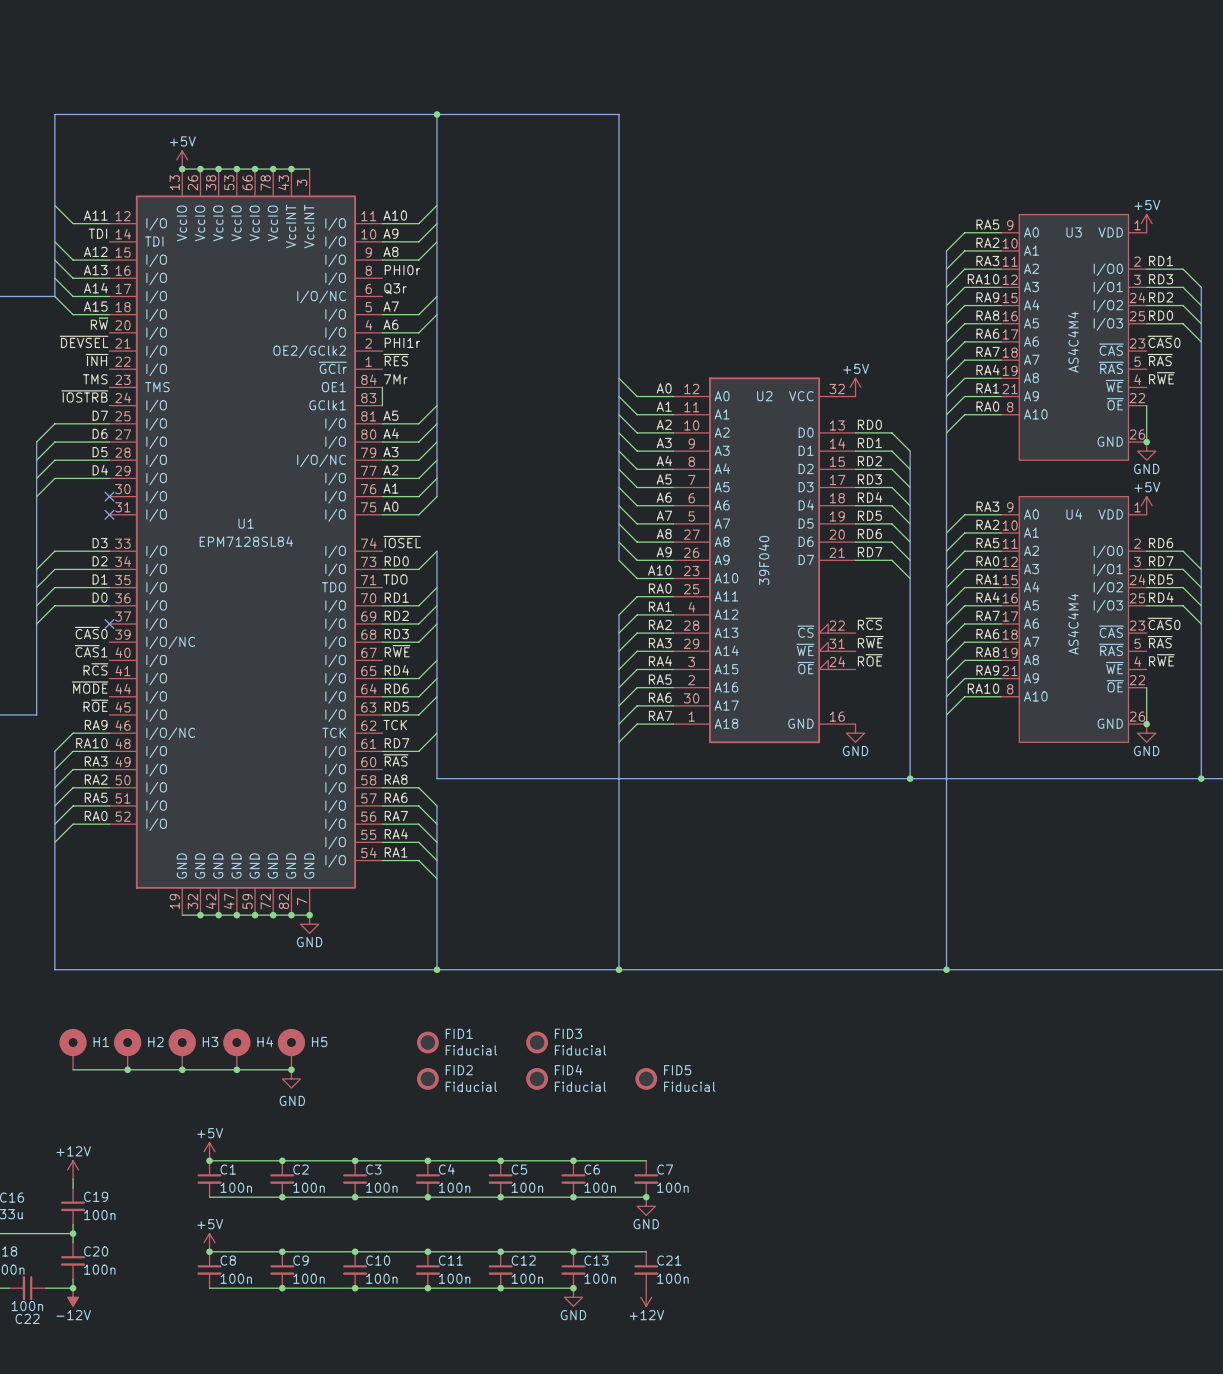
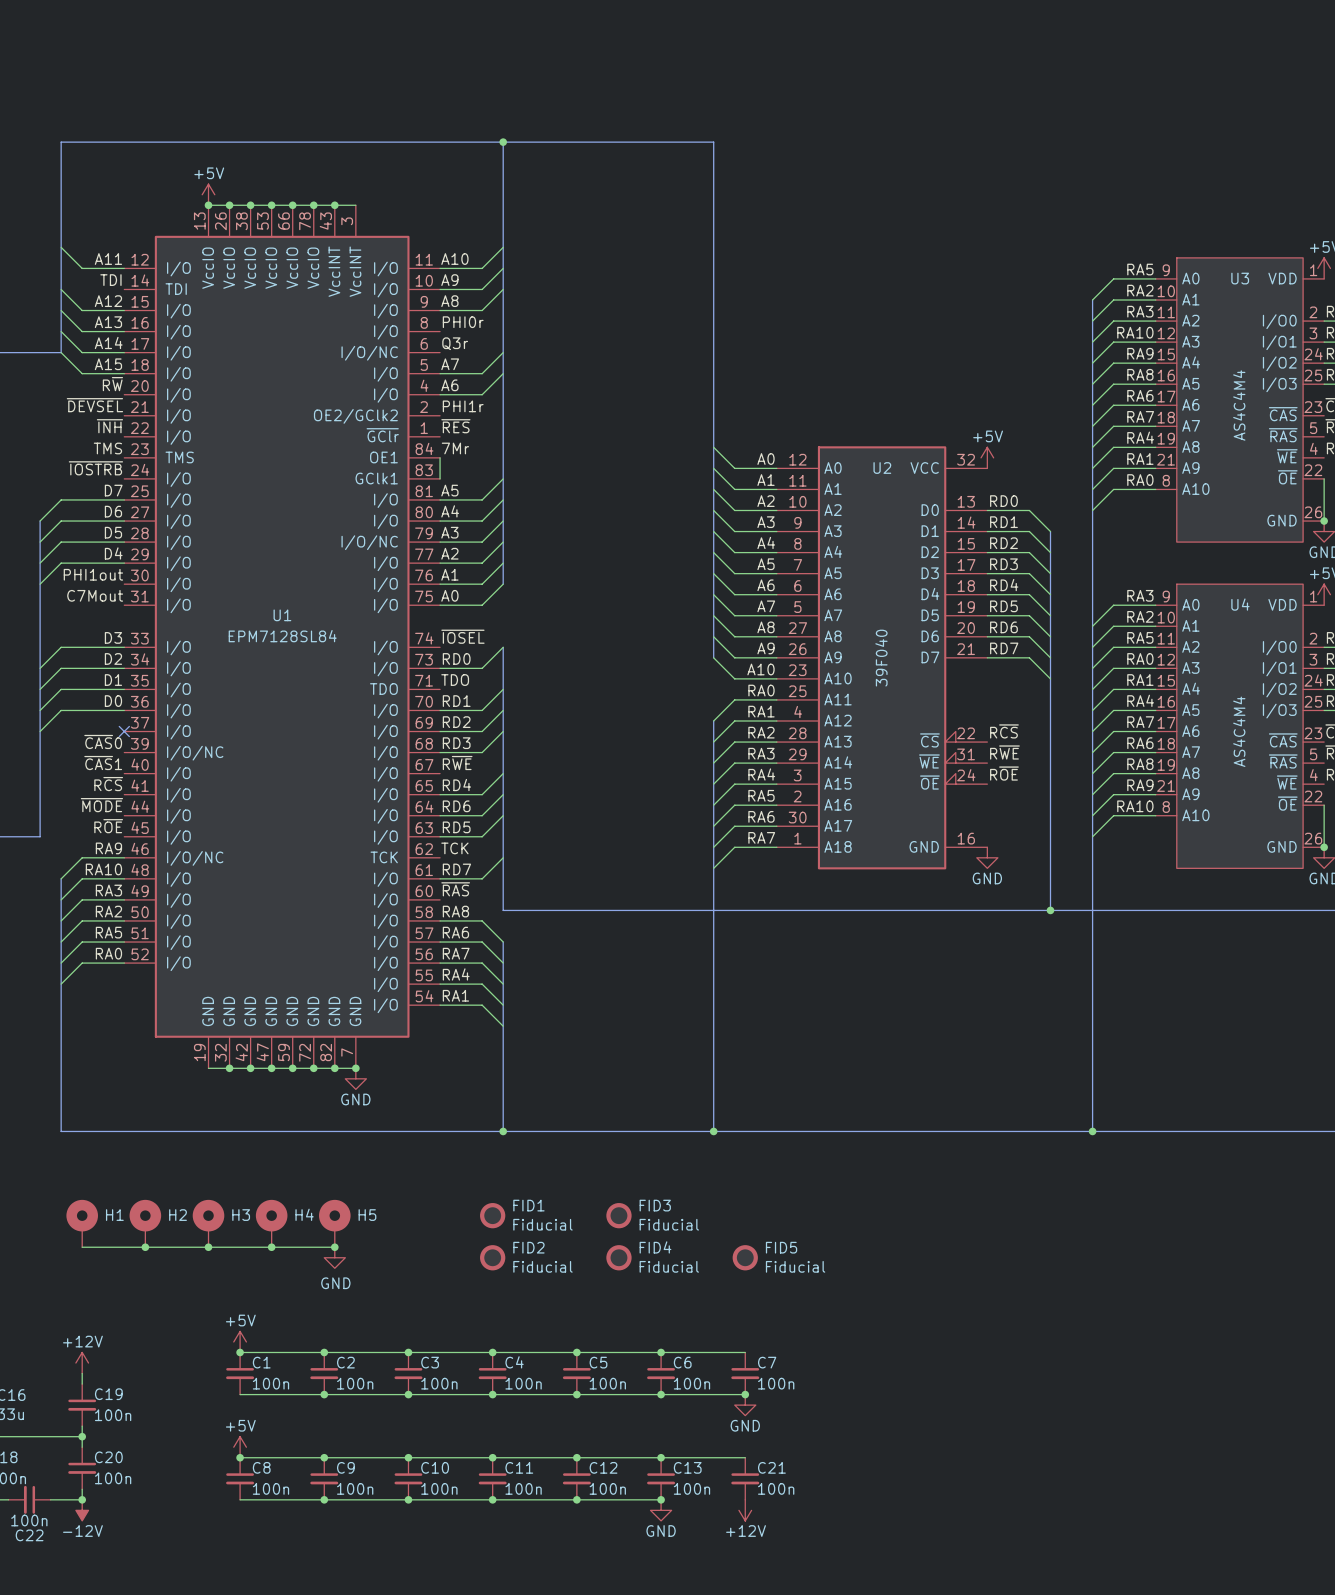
label: none -> PHI1out (93, 574)
no-connect mark: (109, 496) -> none
label: none -> C7Mout (95, 595)
no-connect mark: (109, 514) -> none

